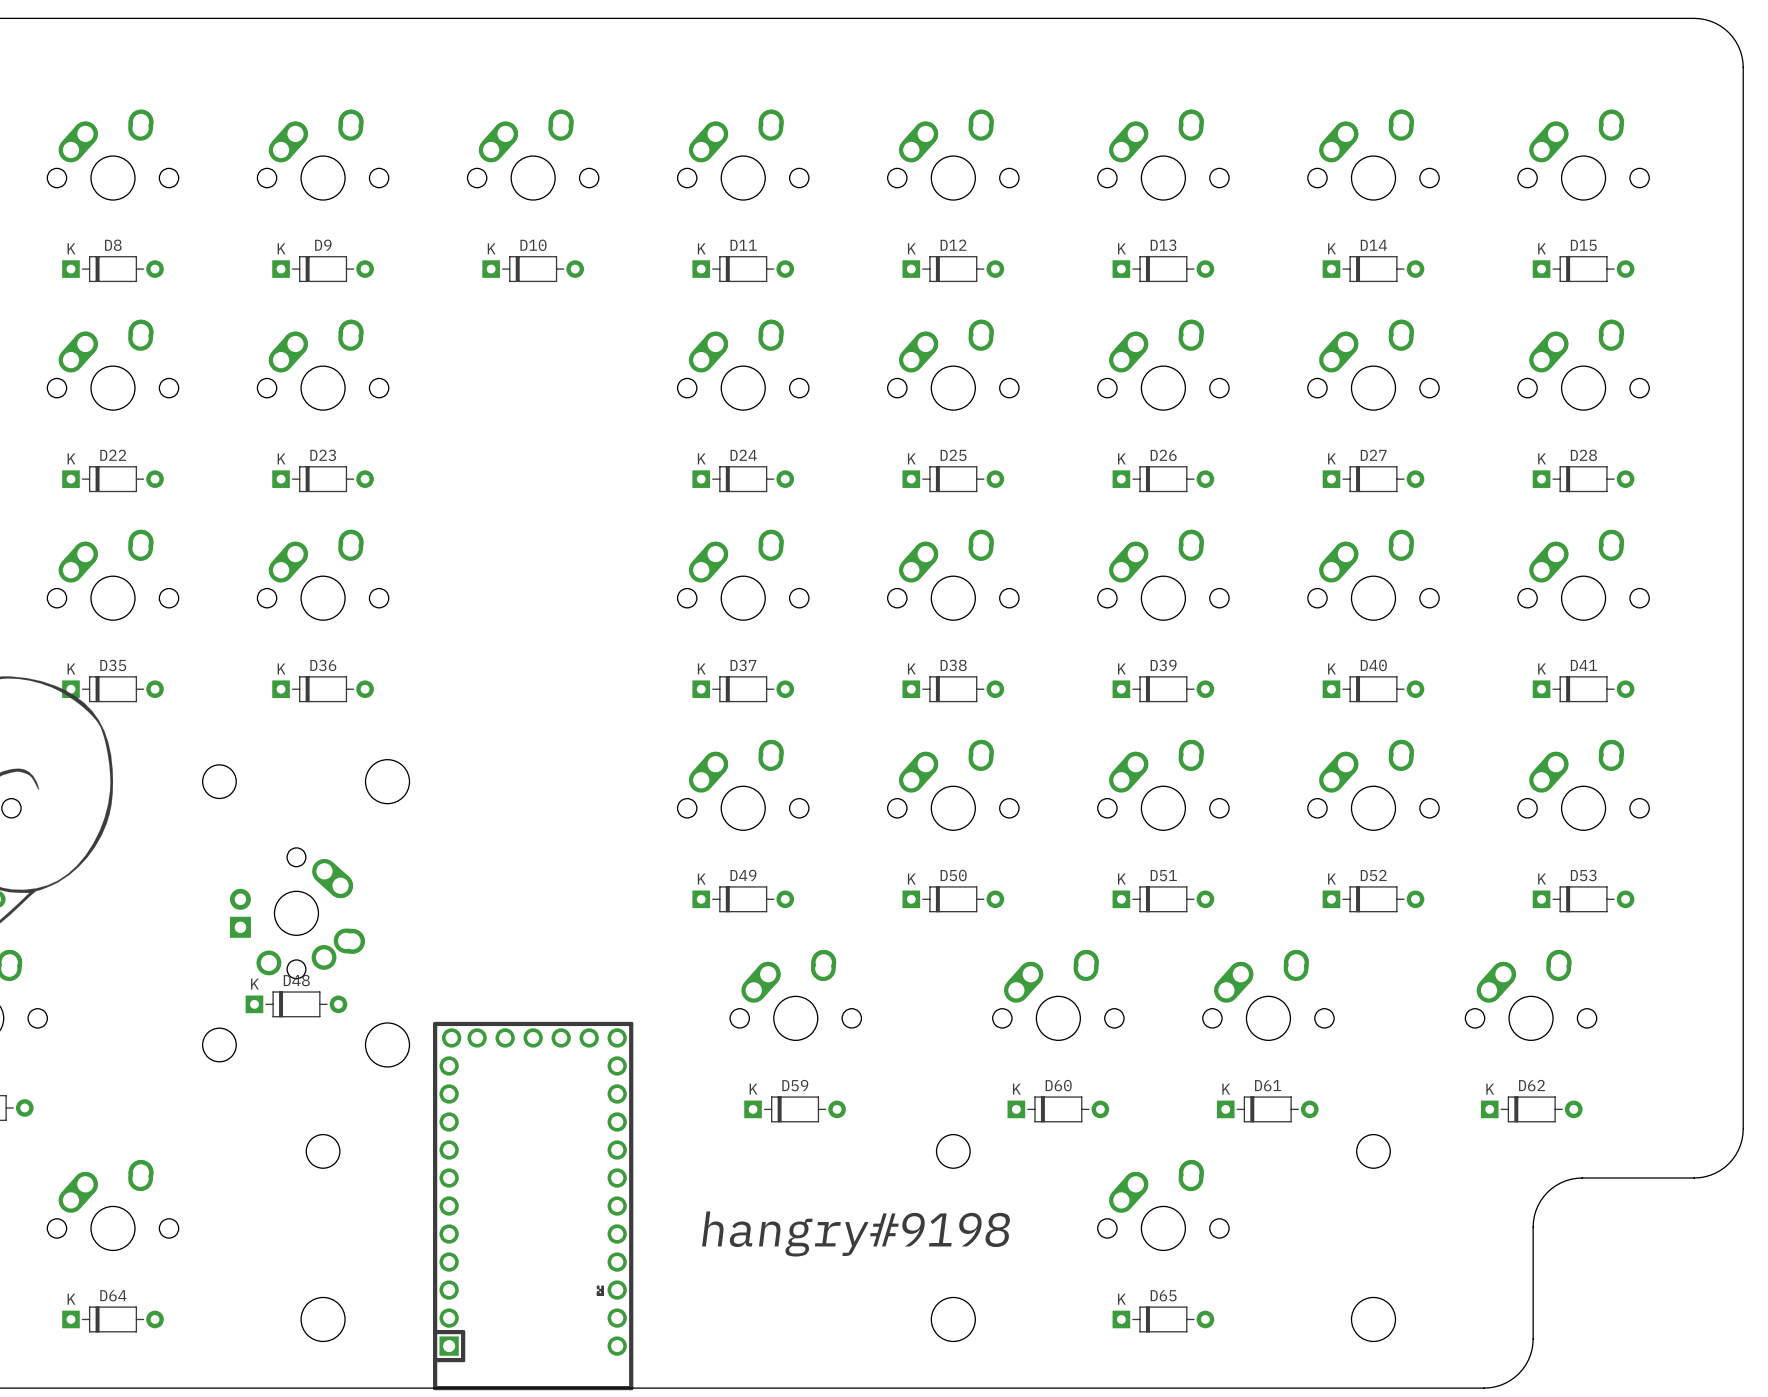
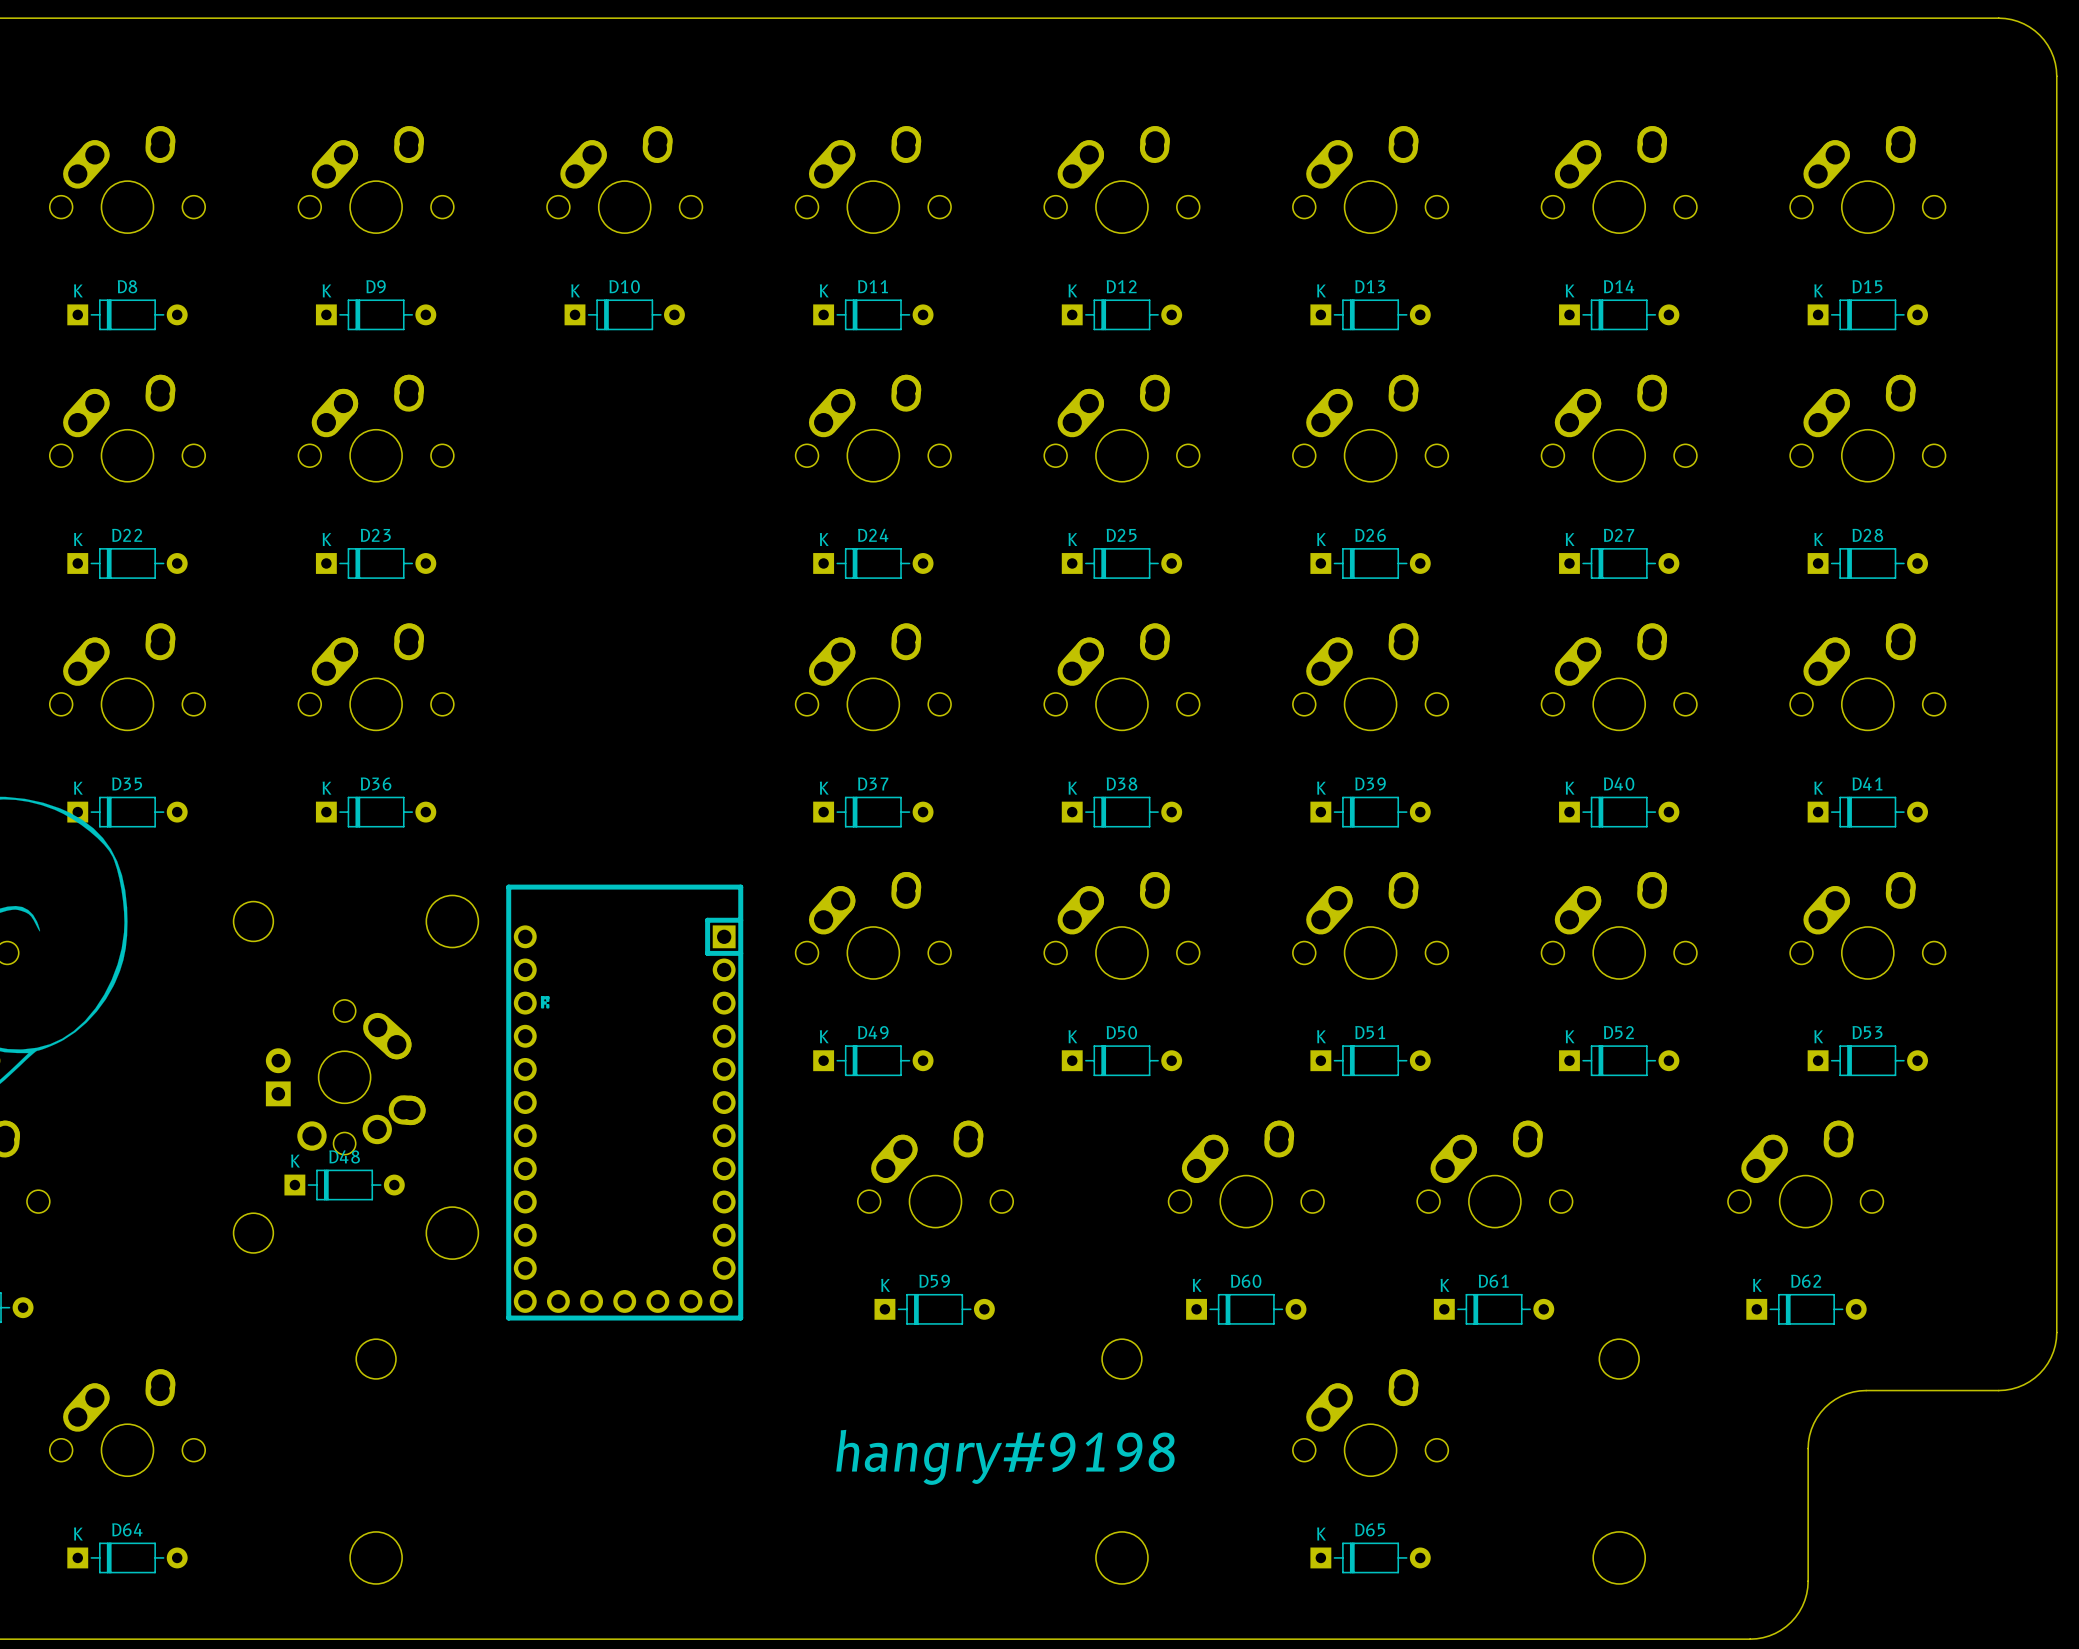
part rotation: 0° (533, 1206) -> 180° (624, 1102)
part position: (533, 1206) -> (624, 1102)

